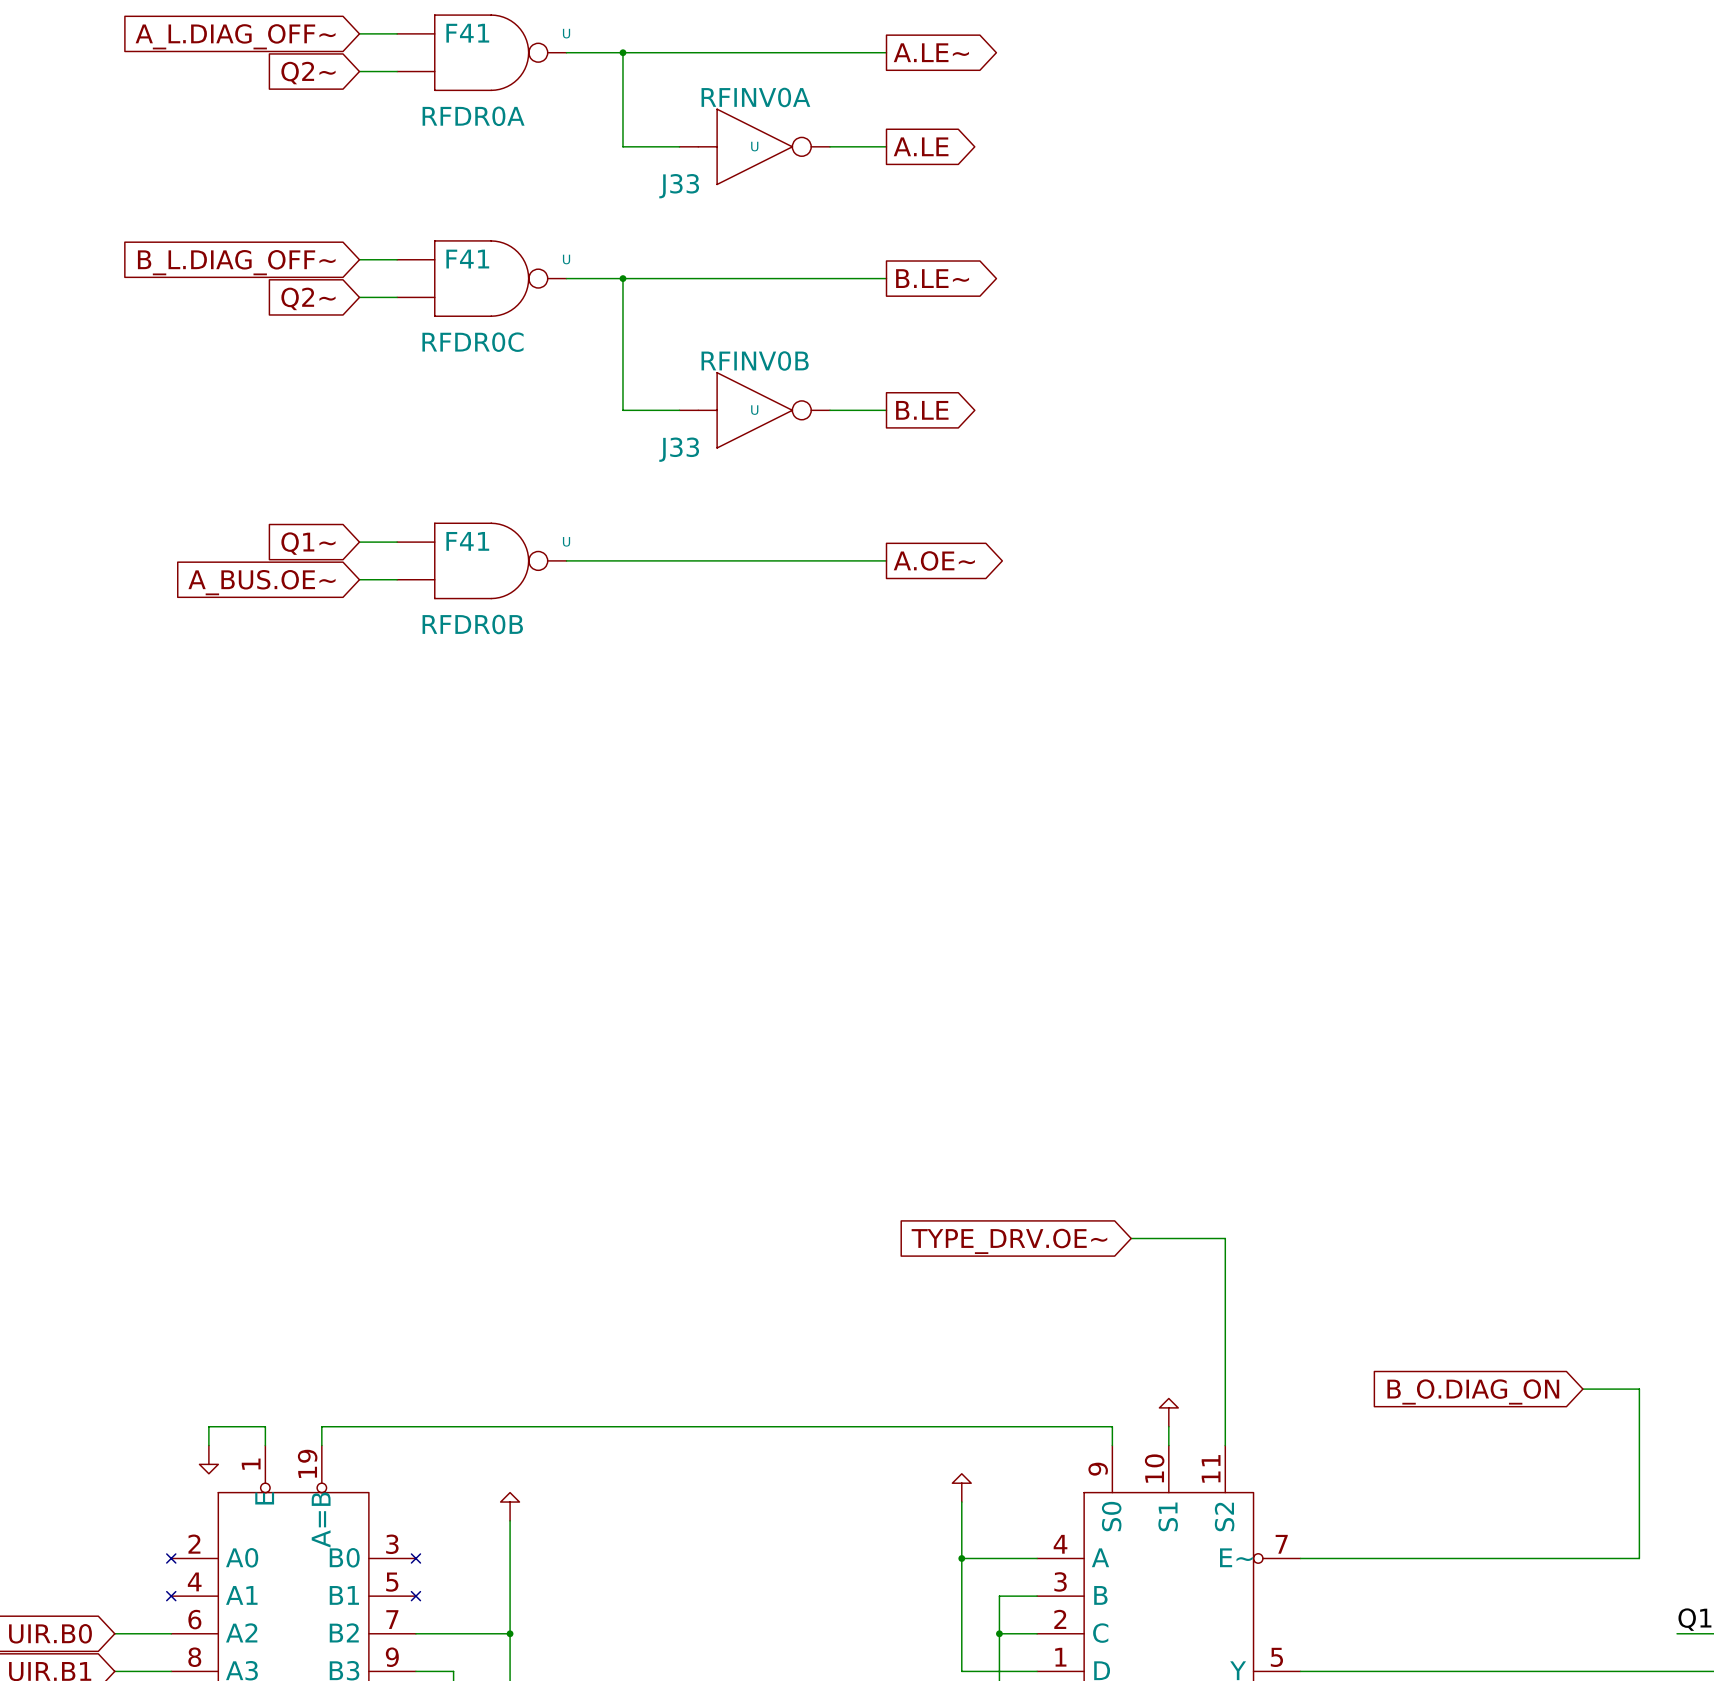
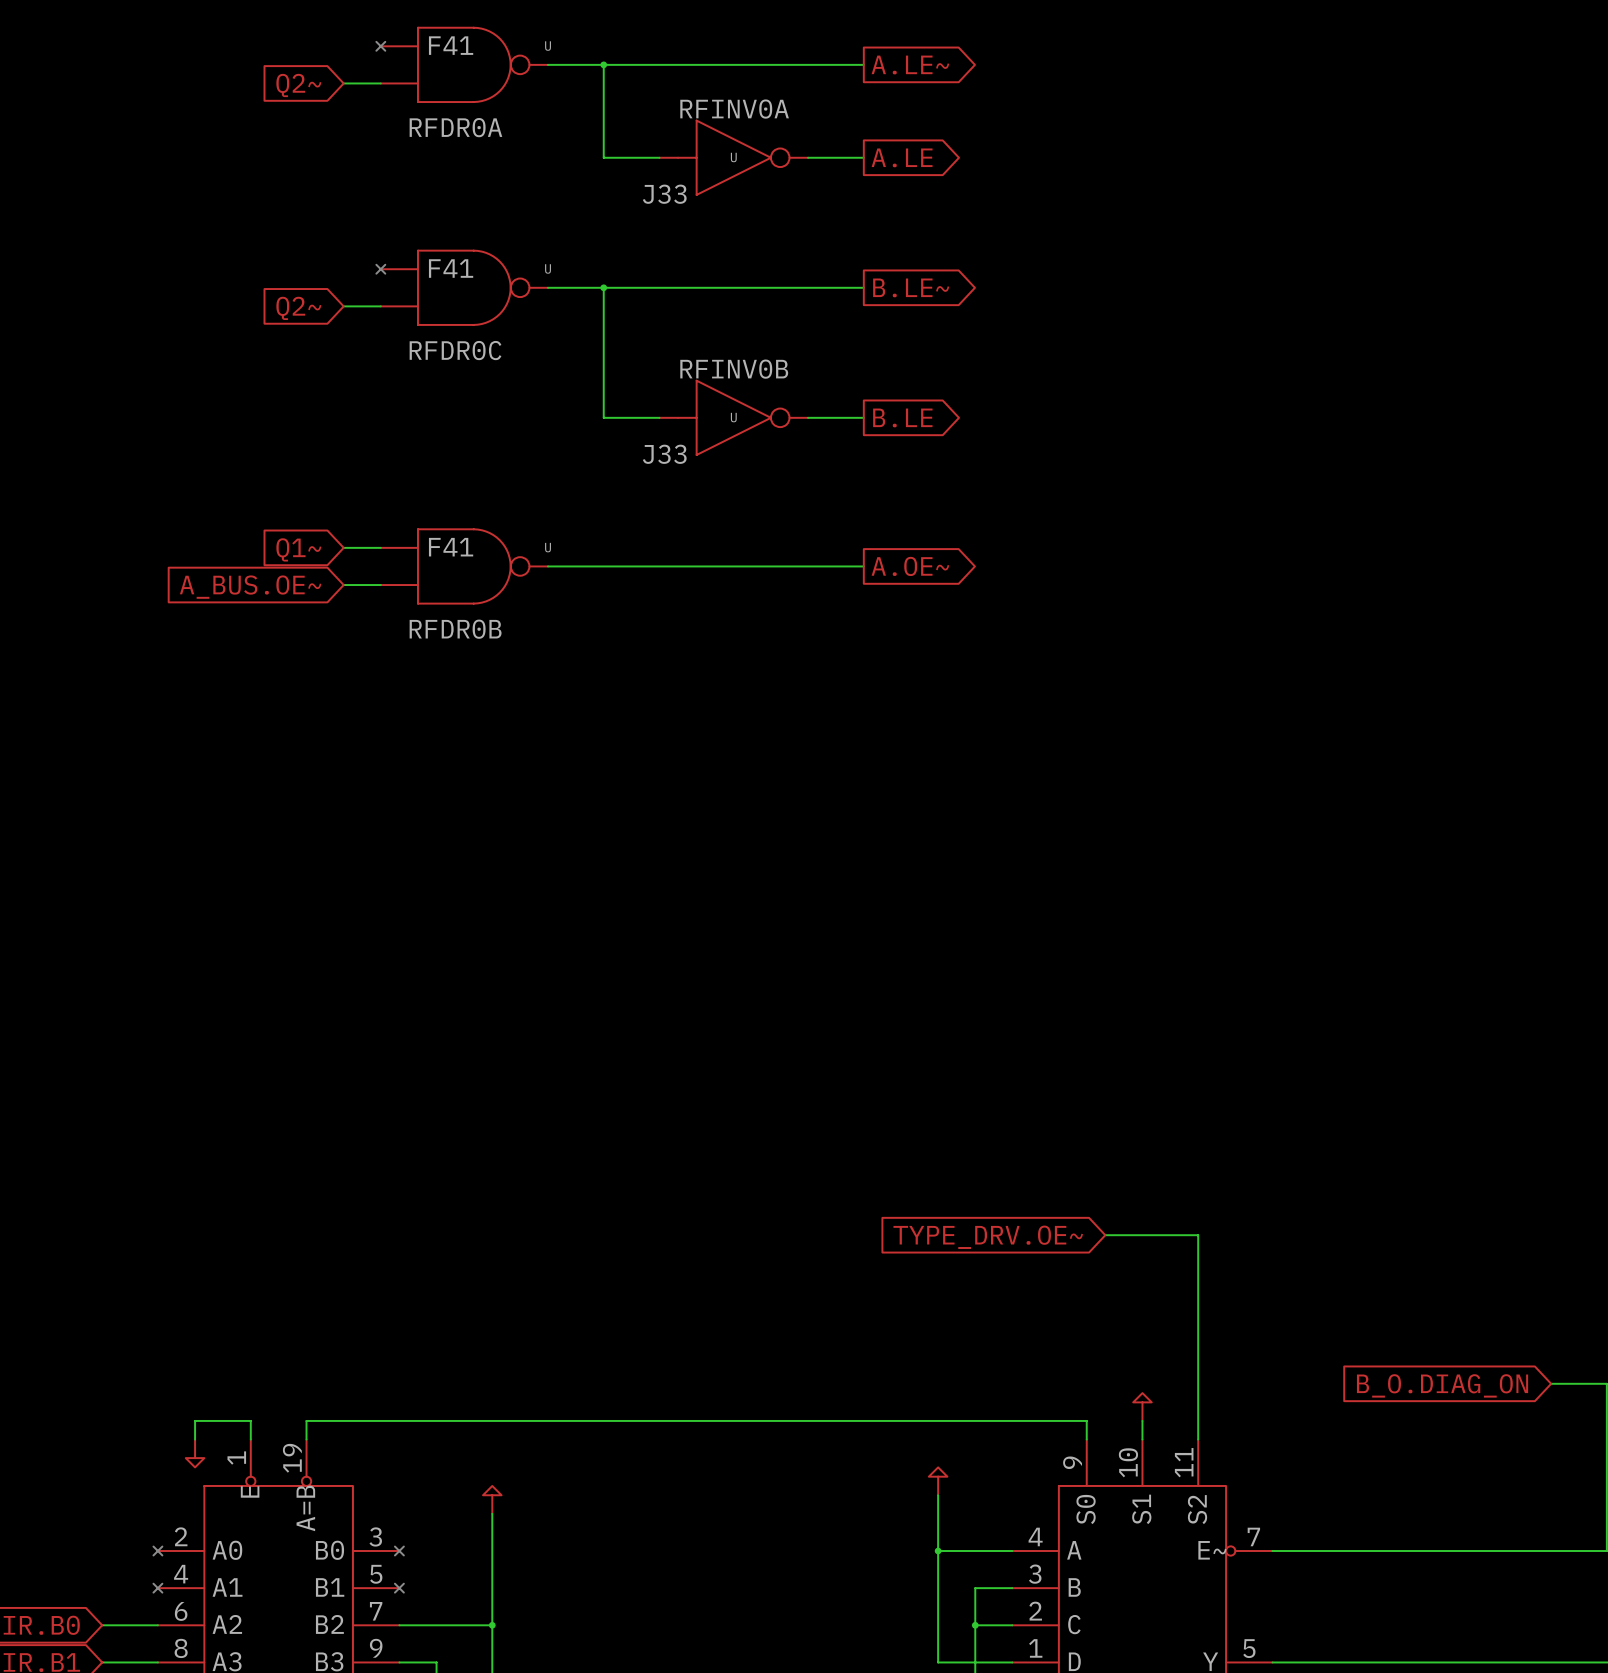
wire: (359, 33) (397, 33) -> none
no-connect mark: none -> (380, 46)
global label: A_L.DIAG_OFF~ (235, 36) -> none
wire: (359, 259) (397, 259) -> none
no-connect mark: none -> (380, 269)
global label: B_L.DIAG_OFF~ (236, 262) -> none

